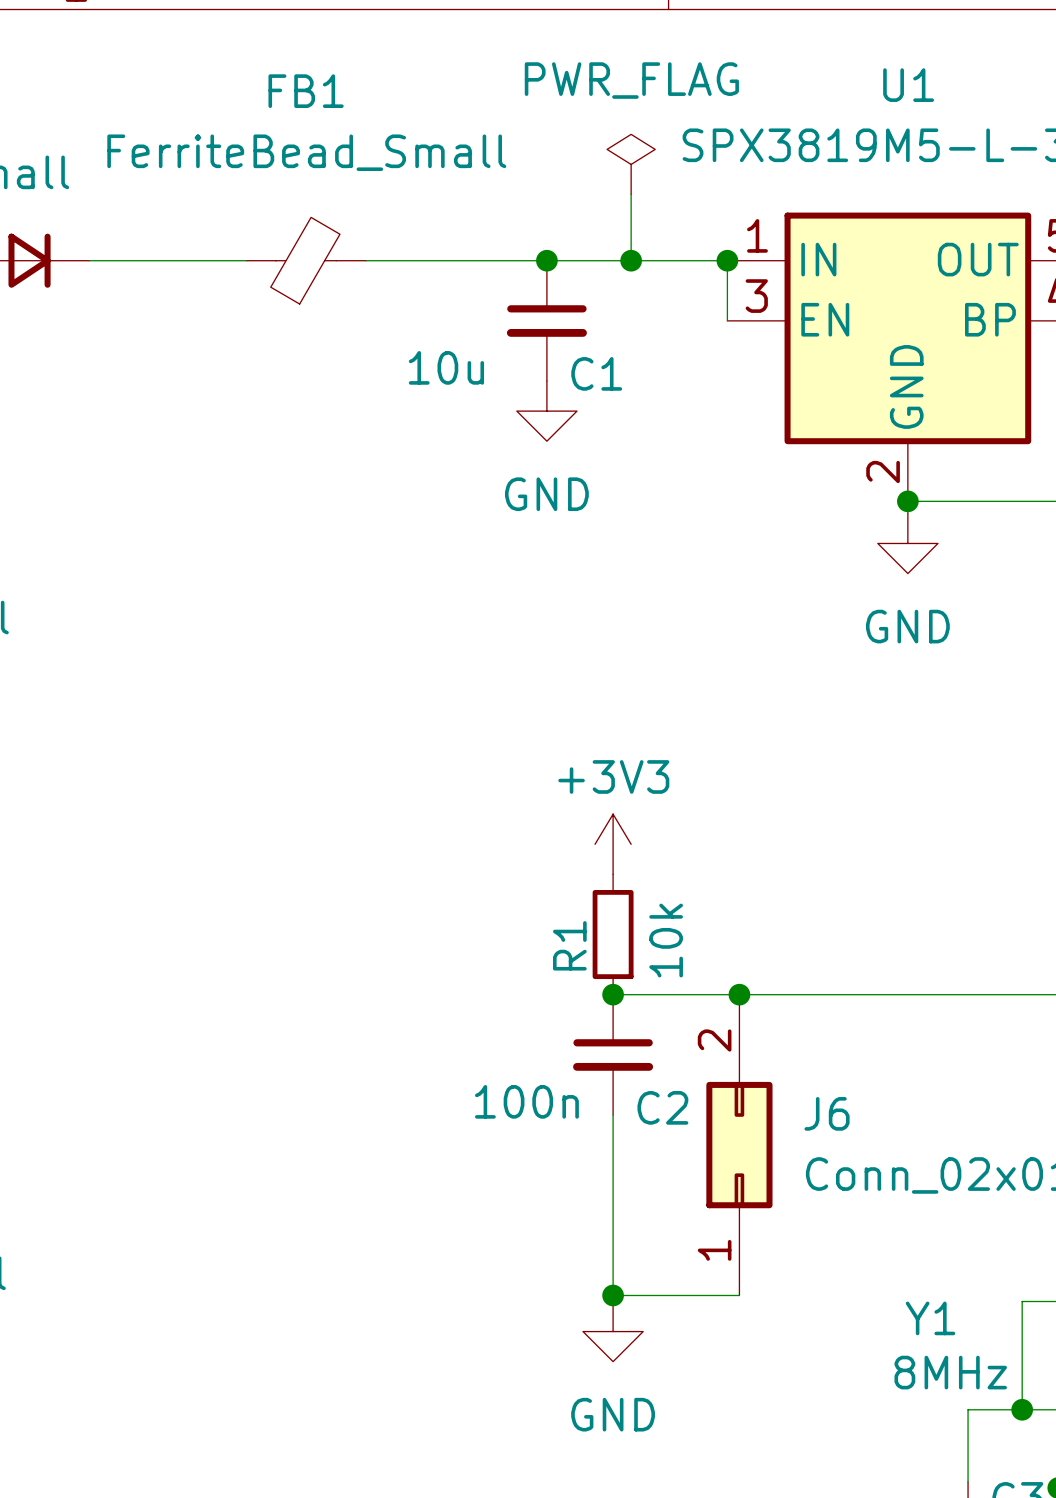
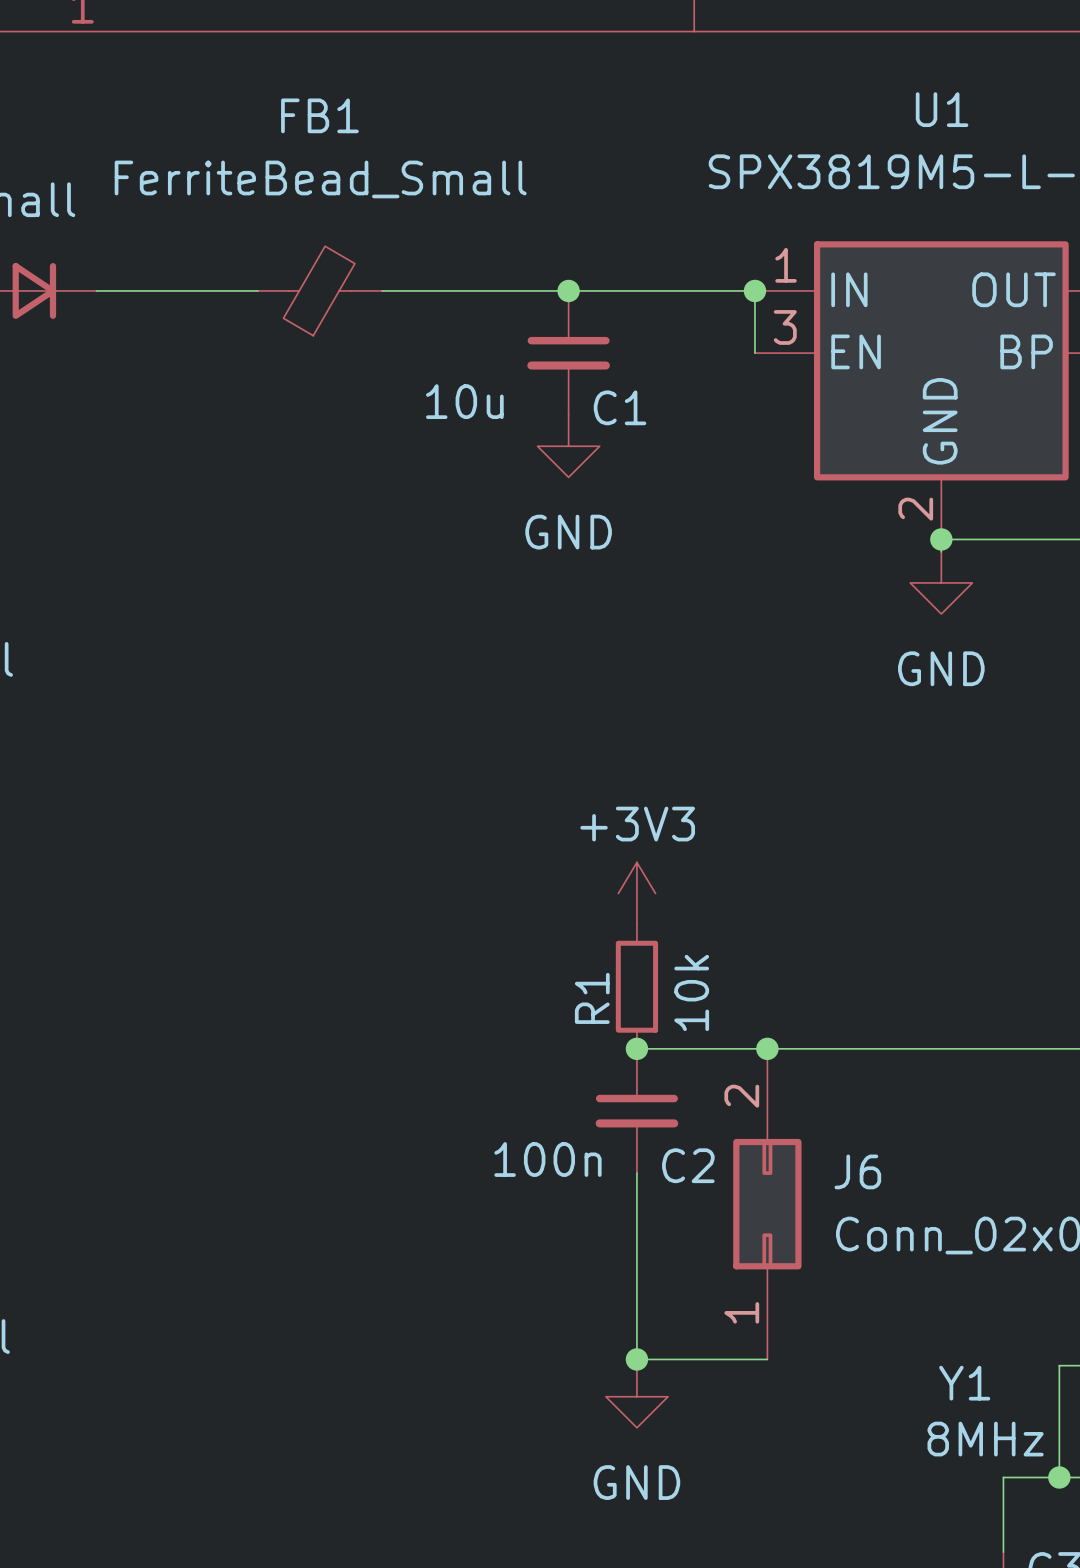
power symbol: PWR_FLAG (631, 164) -> none
wire: (631, 194) (631, 260) -> none
junction: (631, 260) -> none

